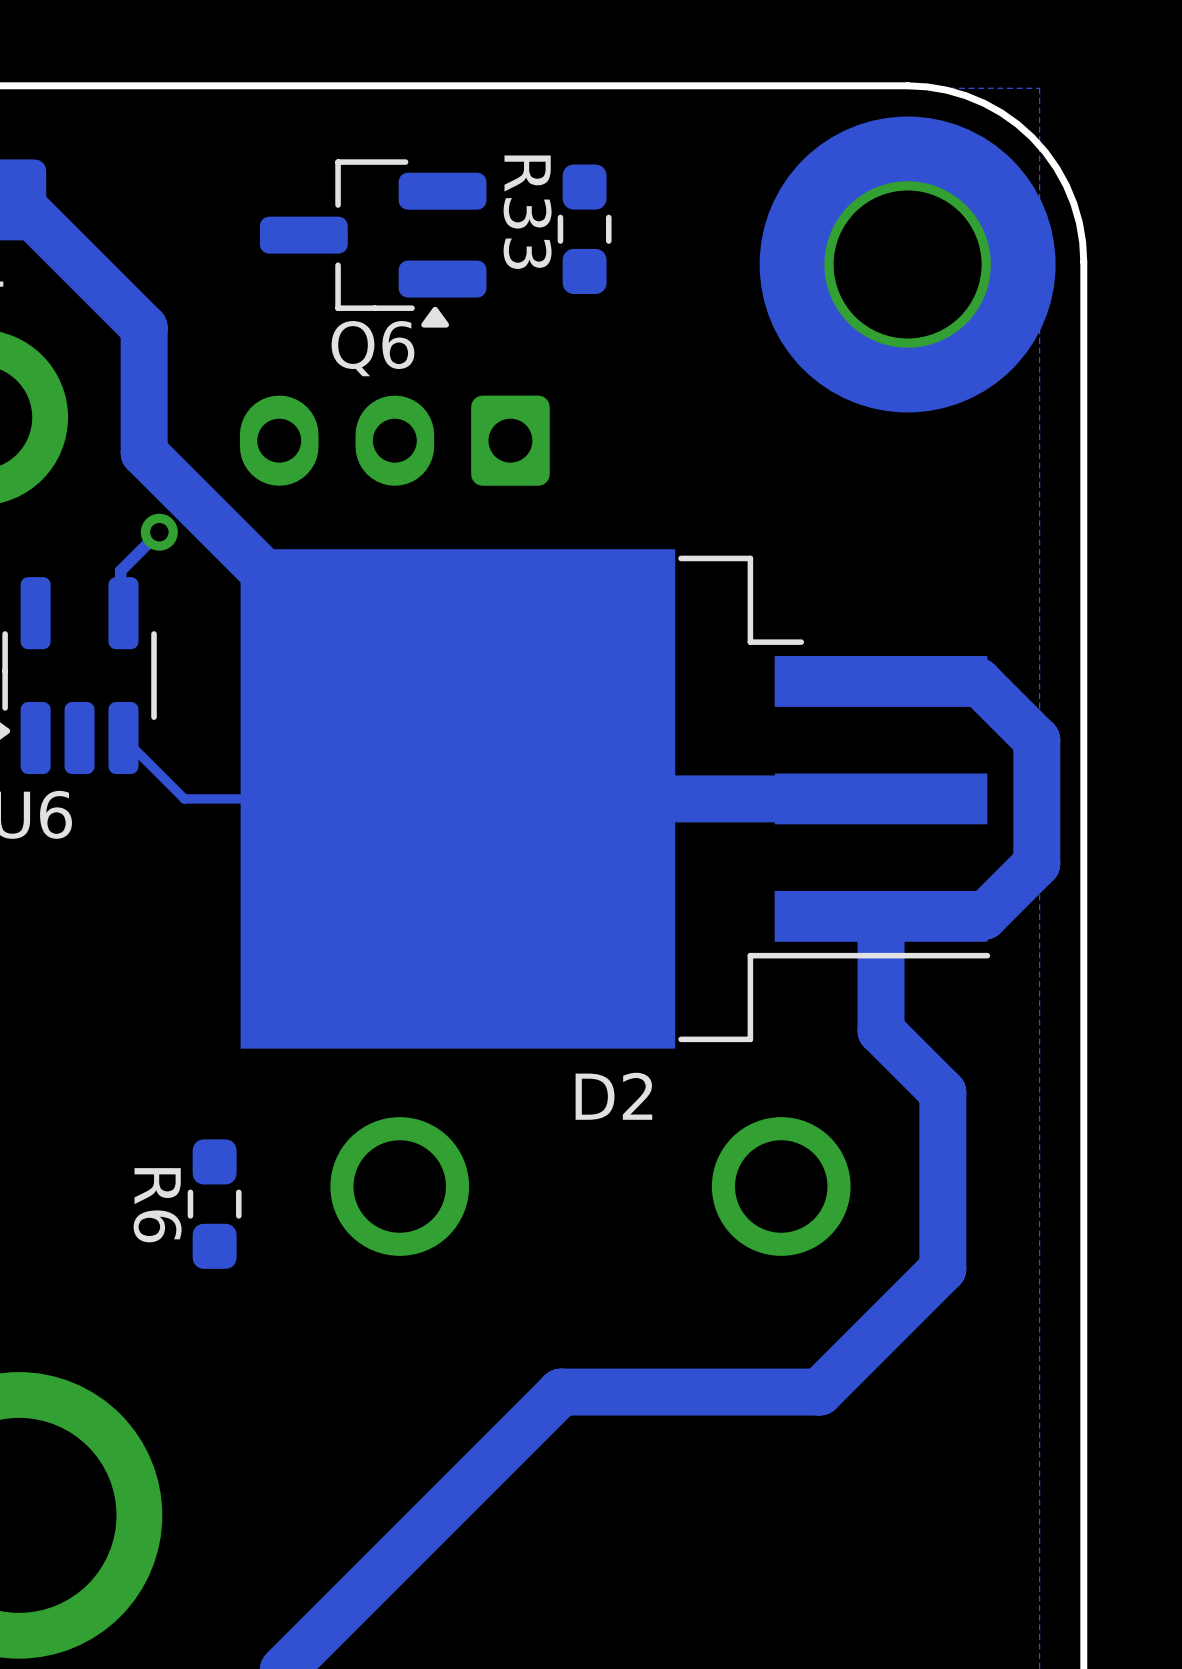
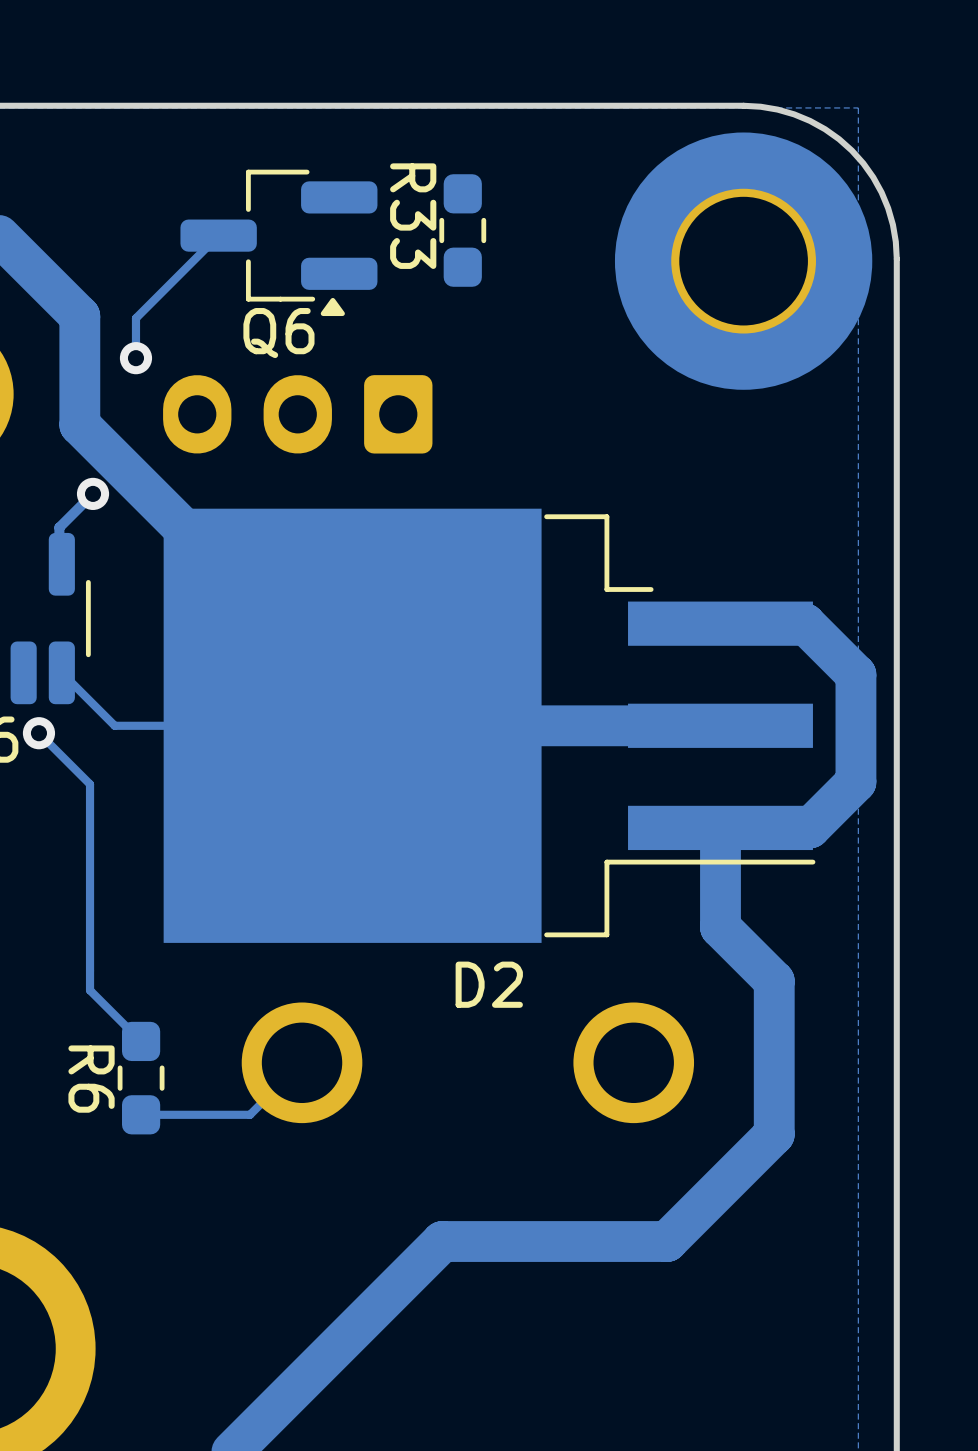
track: none -> (218, 235) (135, 318) (135, 358)
via: none -> (135, 358)
track: none -> (38, 733) (90, 784) (90, 990) (141, 1041)
via: none -> (38, 733)
track: none -> (302, 1062) (250, 1114) (141, 1114)

